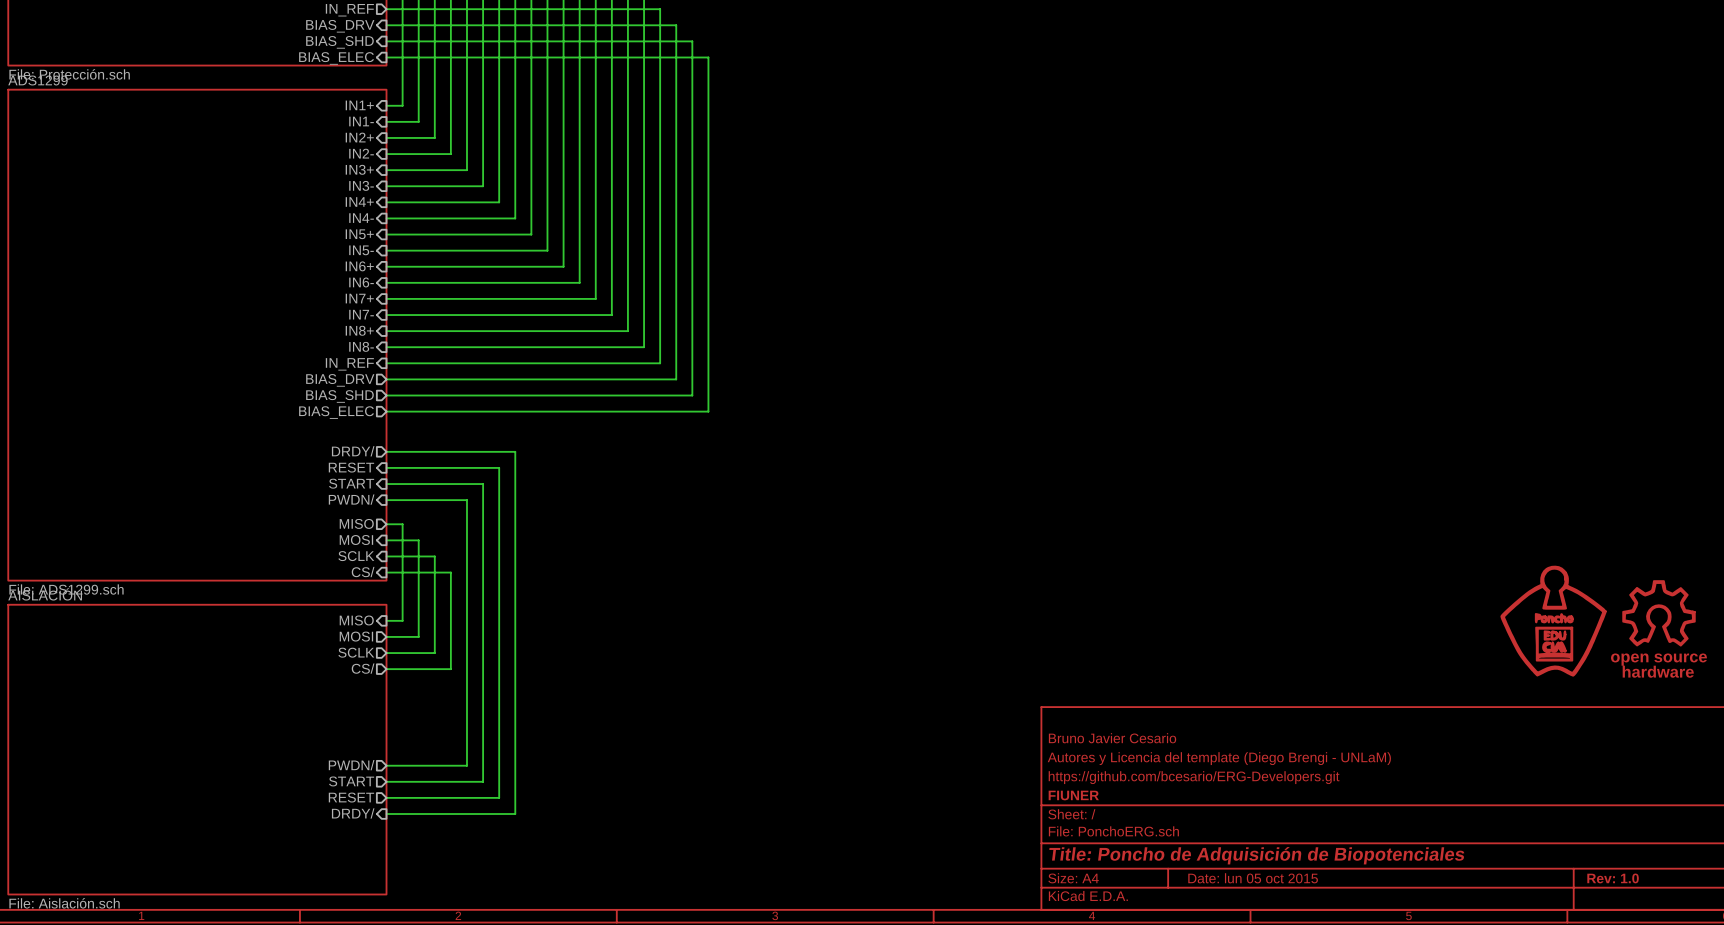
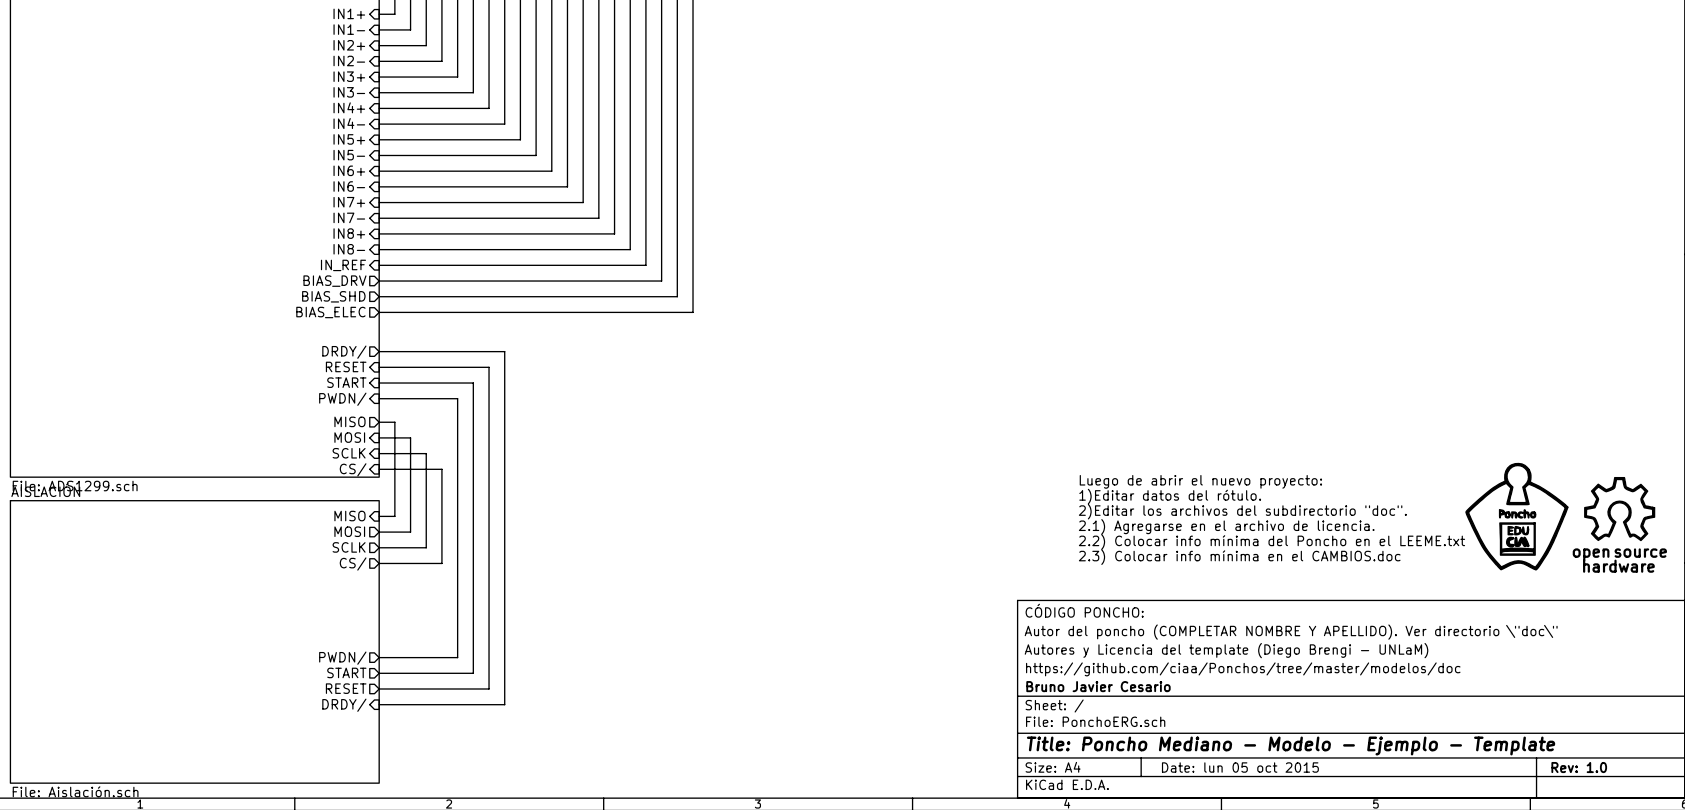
text: none -> Luego de abrir el nuevo proyecto: (1200, 481)
text: none -> 1)Editar datos del rótulo. (1170, 496)
text: none -> 2)Editar los archivos del subdirectorio "doc". (1242, 511)
text: none -> 2.1) Agregarse en el archivo de licencia. (1226, 526)
text: none -> 2.2) Colocar info mínima del Poncho en el LEEME.txt (1271, 542)
text: none -> 2.3) Colocar info mínima en el CAMBIOS.doc (1239, 557)
title block: none -> CÓDIGO PONCHO: (1084, 610)
title block: Bruno Javier Cesario (1112, 738) -> Autor del poncho (COMPLETAR NOMBRE Y APELLIDO). Ver directorio \"doc\" (1291, 632)
title block: https://github.com/bcesario/ERG-Developers.git (1194, 777) -> https://github.com/ciaa/Ponchos/tree/master/modelos/doc (1243, 669)
title block: FIUNER (1073, 795) -> Bruno Javier Cesario (1098, 686)
title block: Title: Poncho de Adquisición de Biopotenciales (1256, 855) -> Title: Poncho Mediano - Modelo - Ejemplo - Template (1291, 745)

